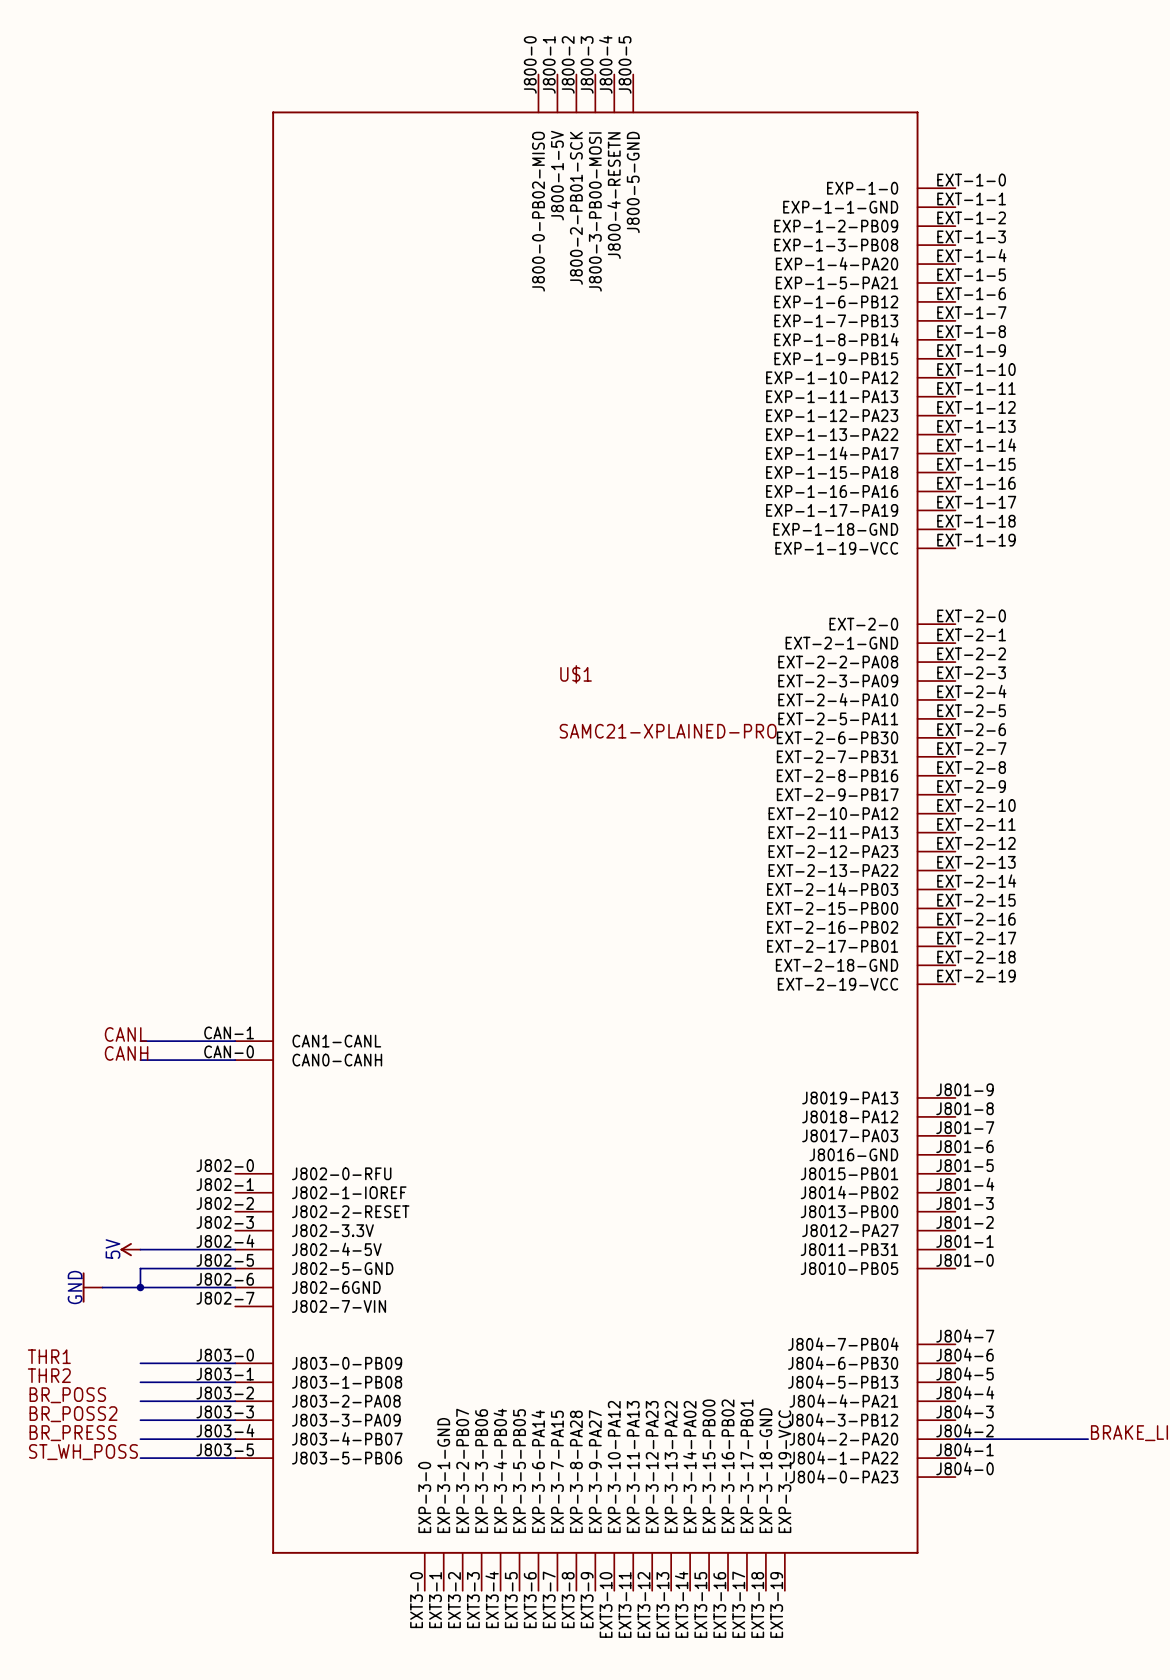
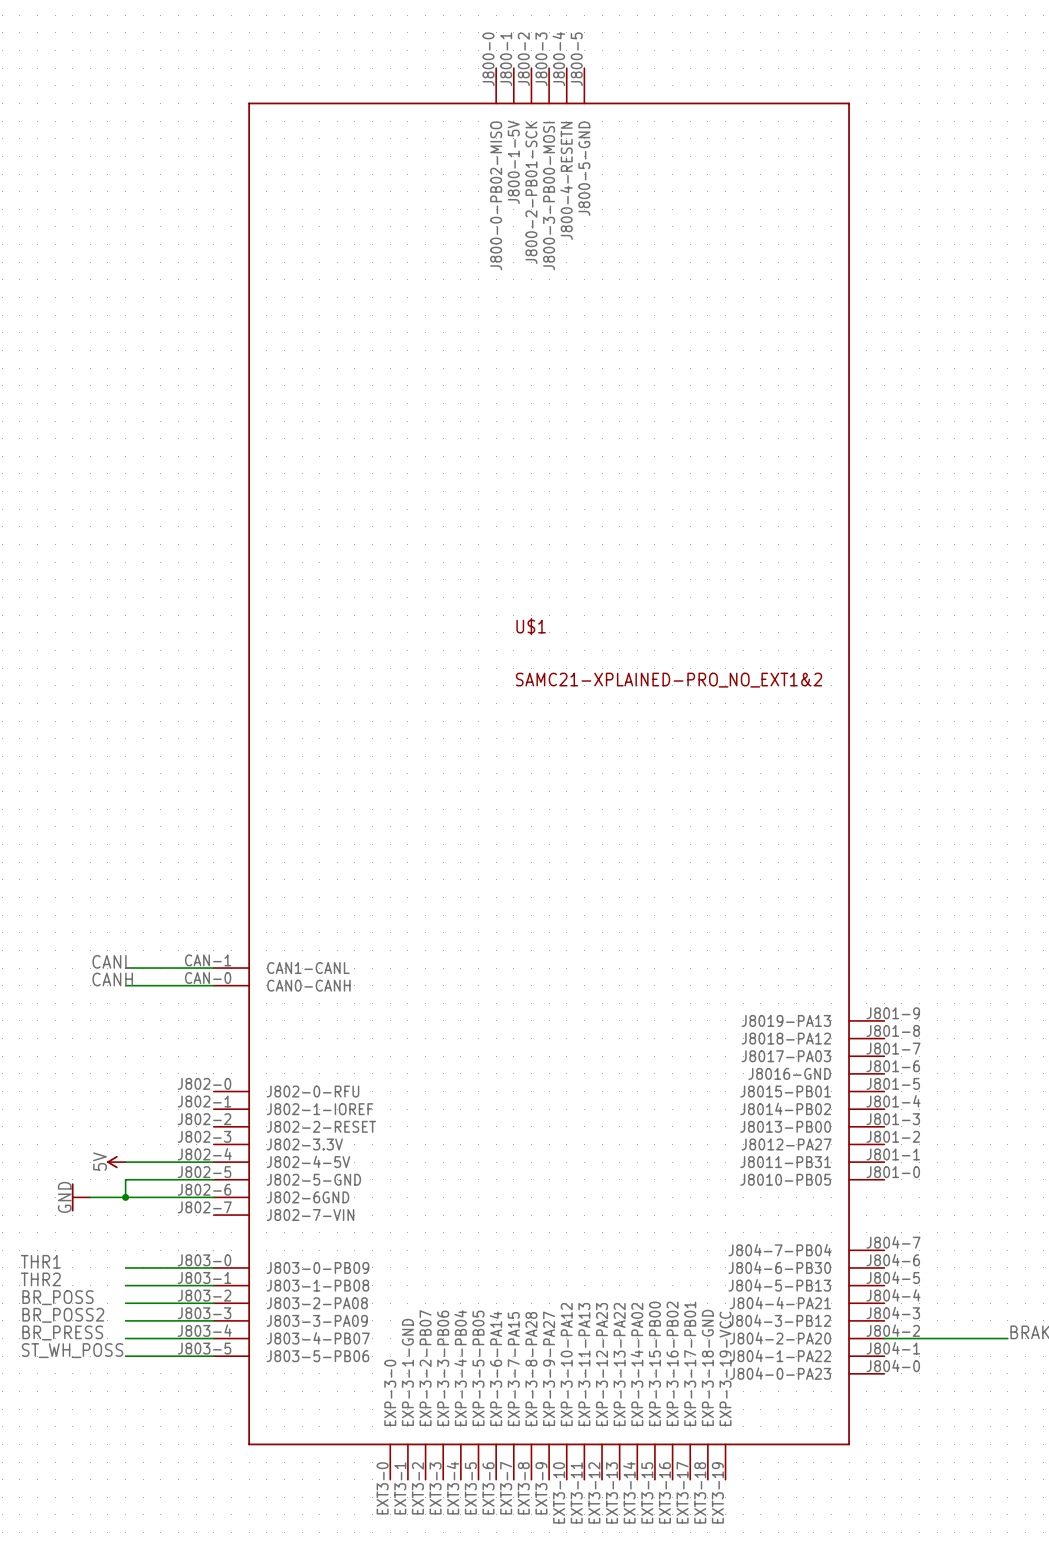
U$1 symbol: [235, 74, 956, 1591] -> [213, 68, 885, 1480]
U$1 value: SAMC21-XPLAINED-PRO (668, 731) -> SAMC21-XPLAINED-PRO_NO_EXT1&2 (669, 680)

